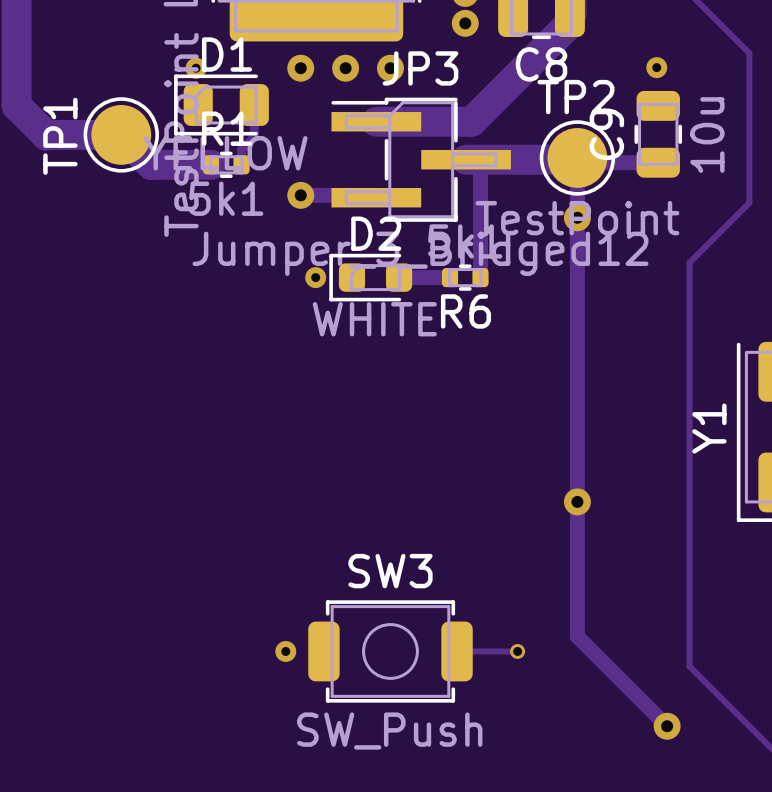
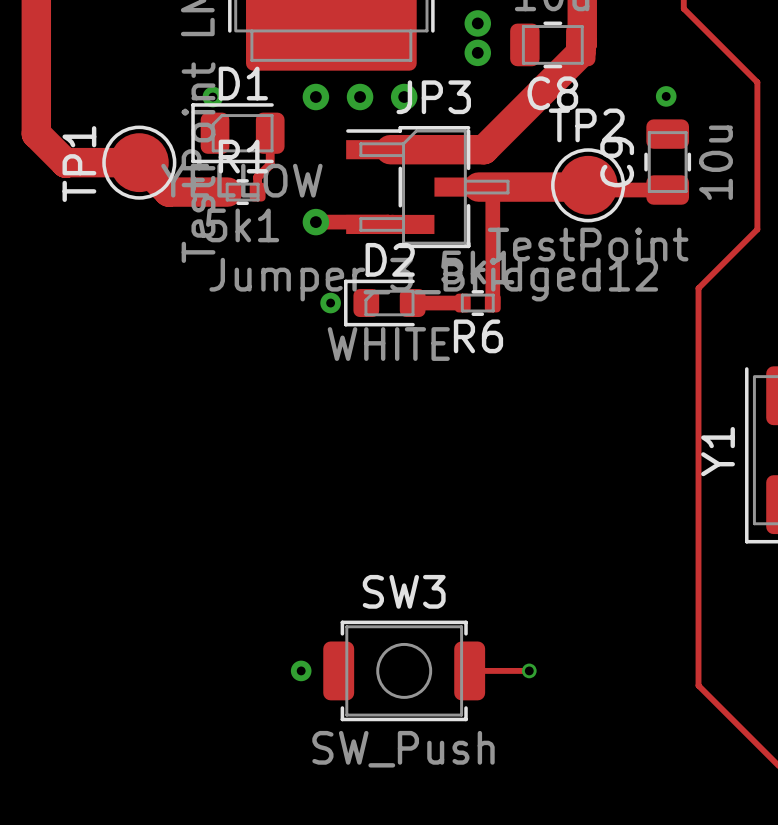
track: (577, 157) (577, 636) (667, 726) -> none
via: (577, 217) -> none
via: (577, 501) -> none
via: (667, 726) -> none

